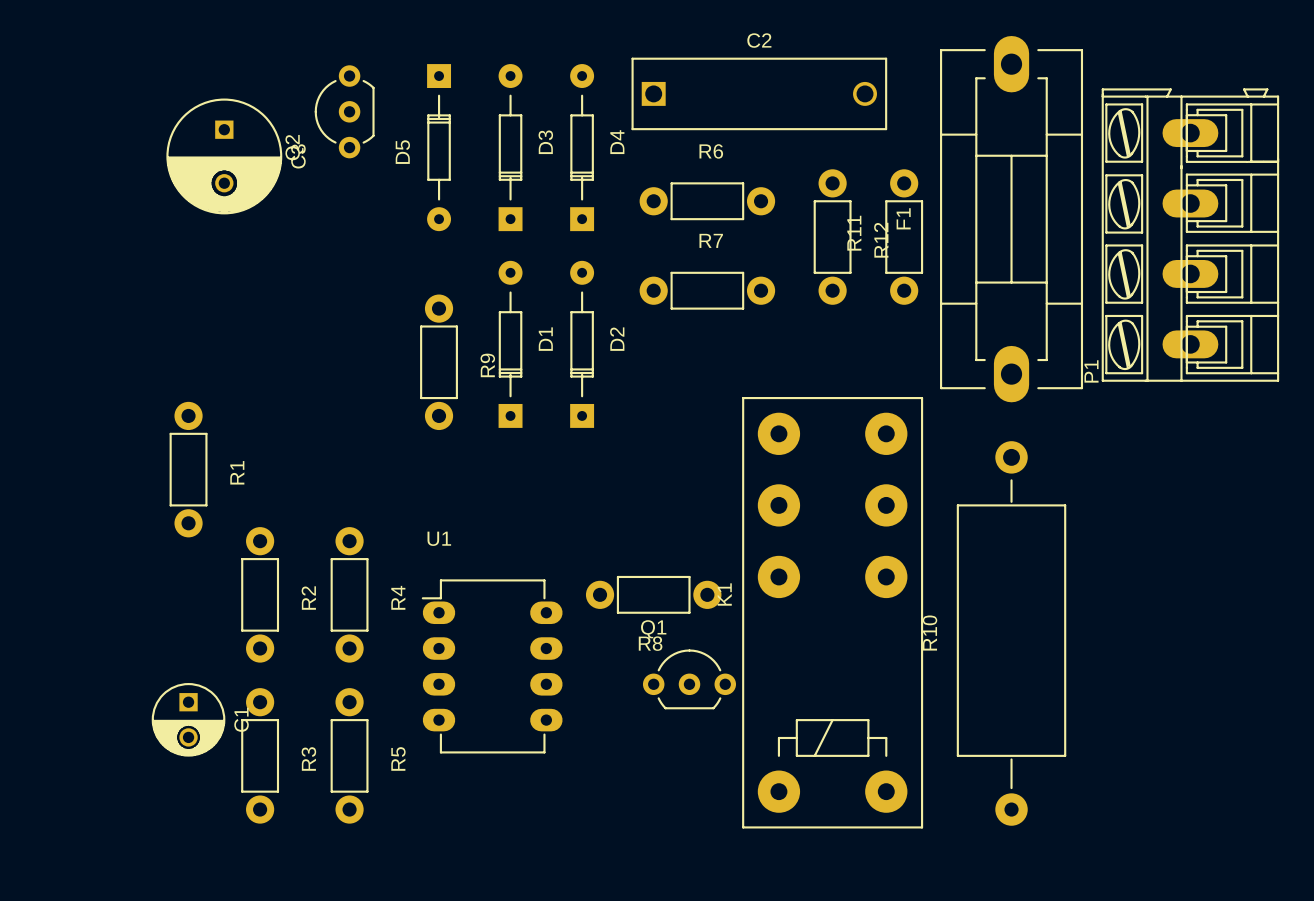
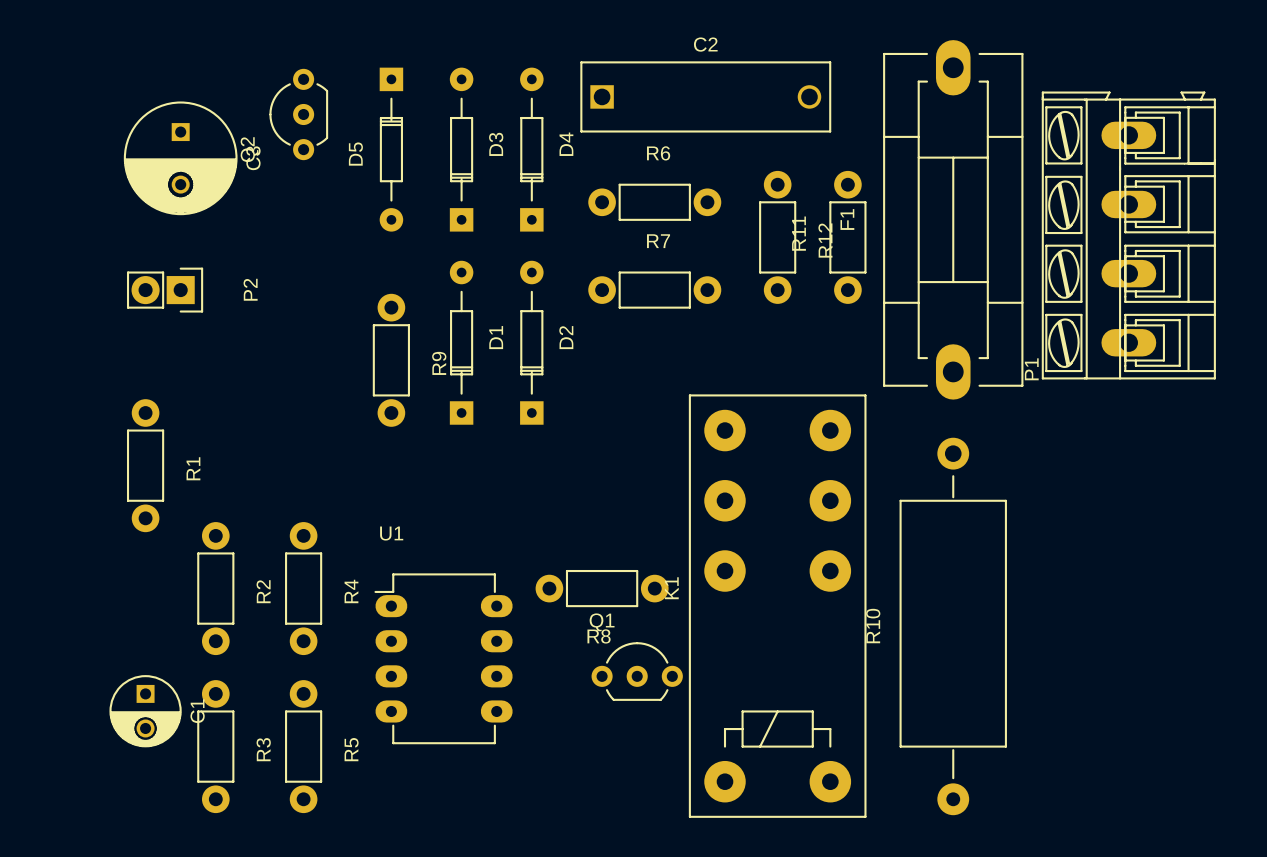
P2: none -> (165, 290)

